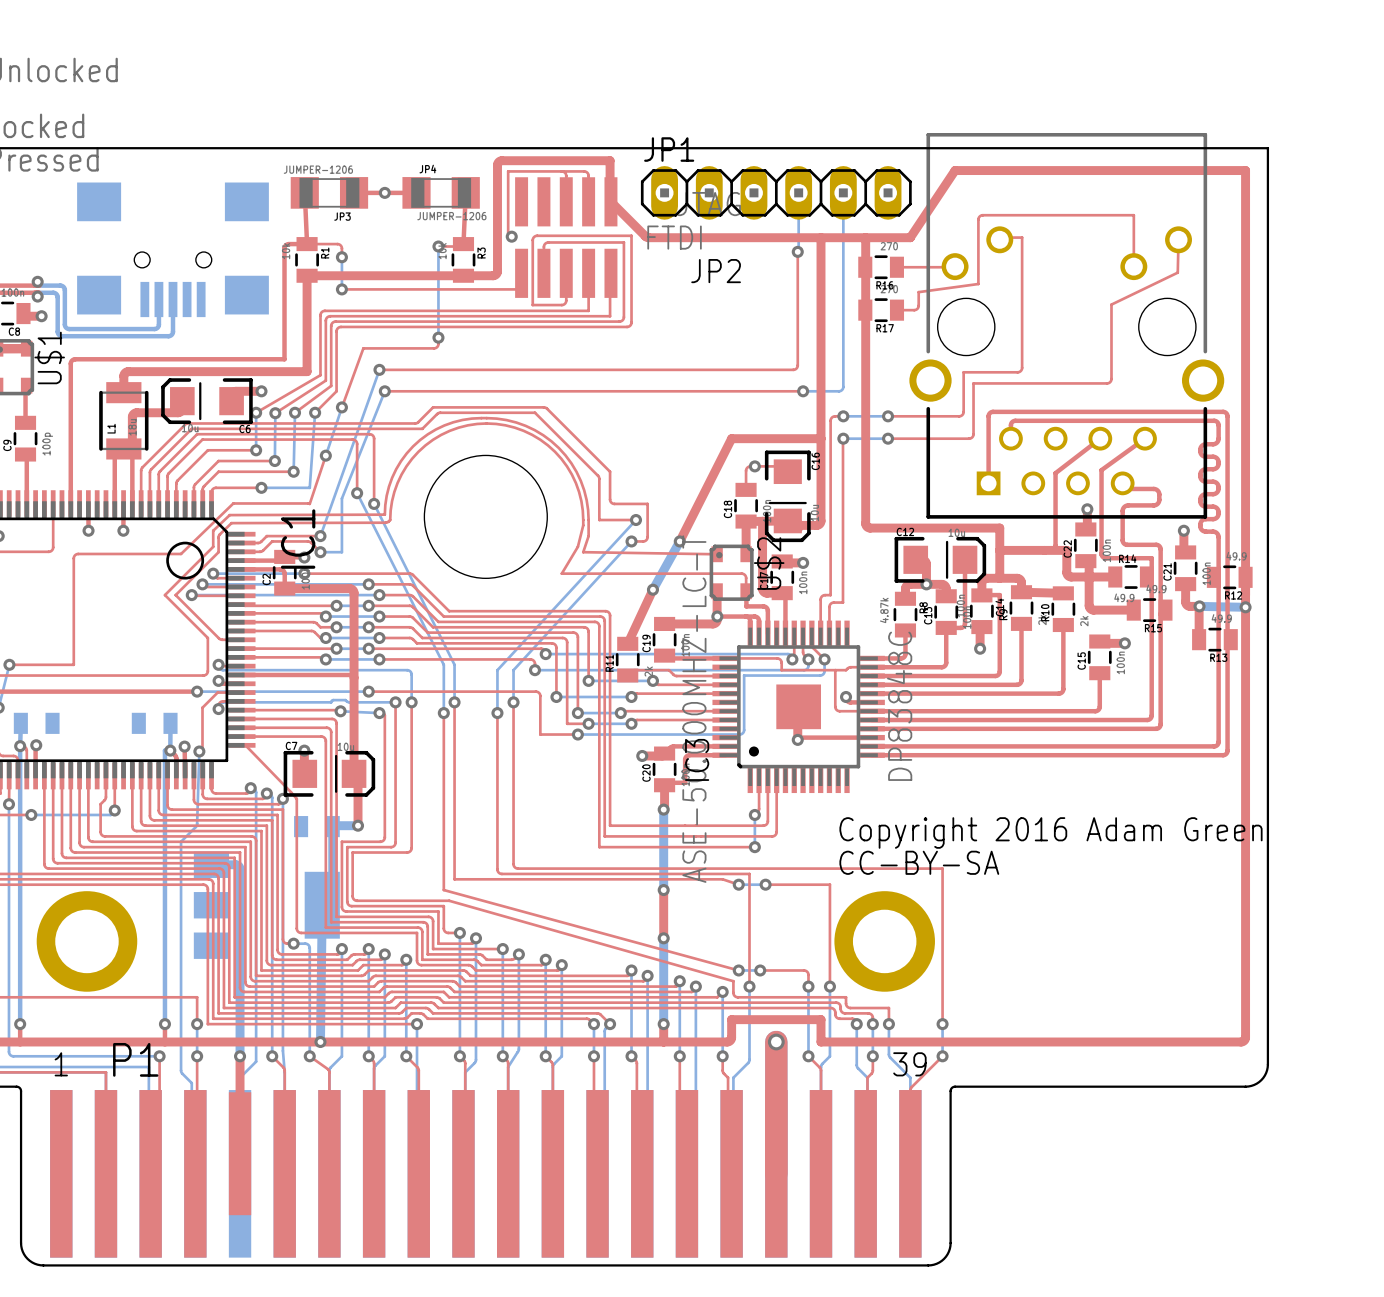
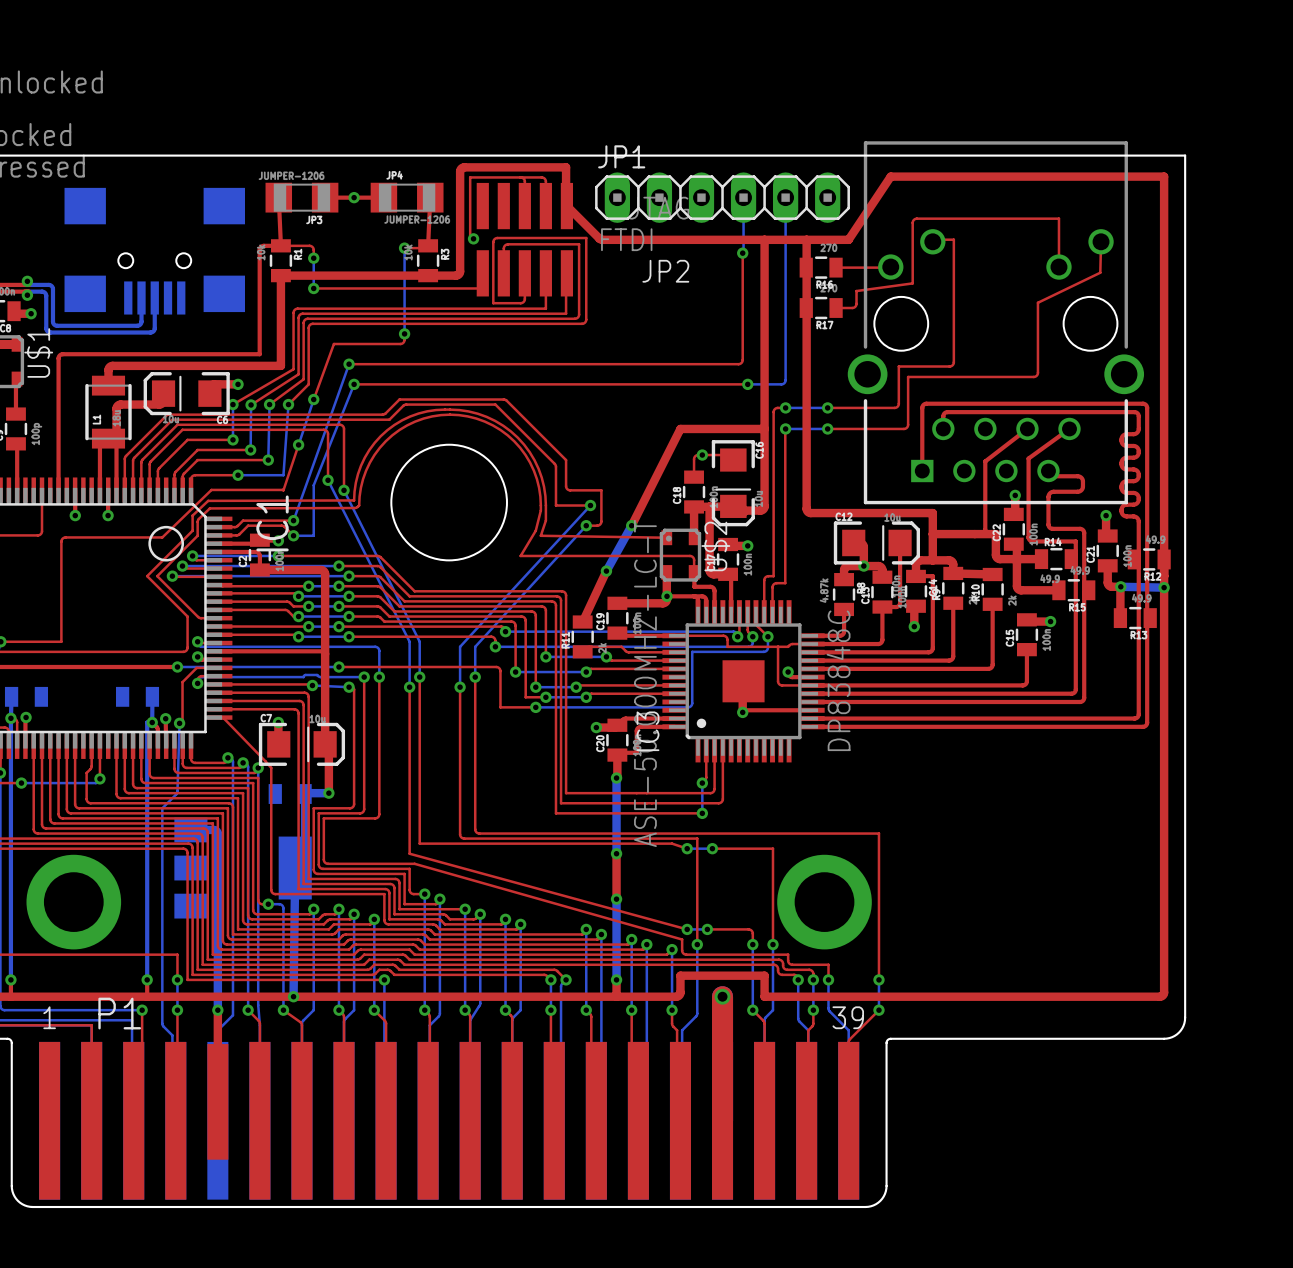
text: Copyright 2016 Adam Green (1050, 832) -> none
text: CC-BY-SA (919, 862) -> none

